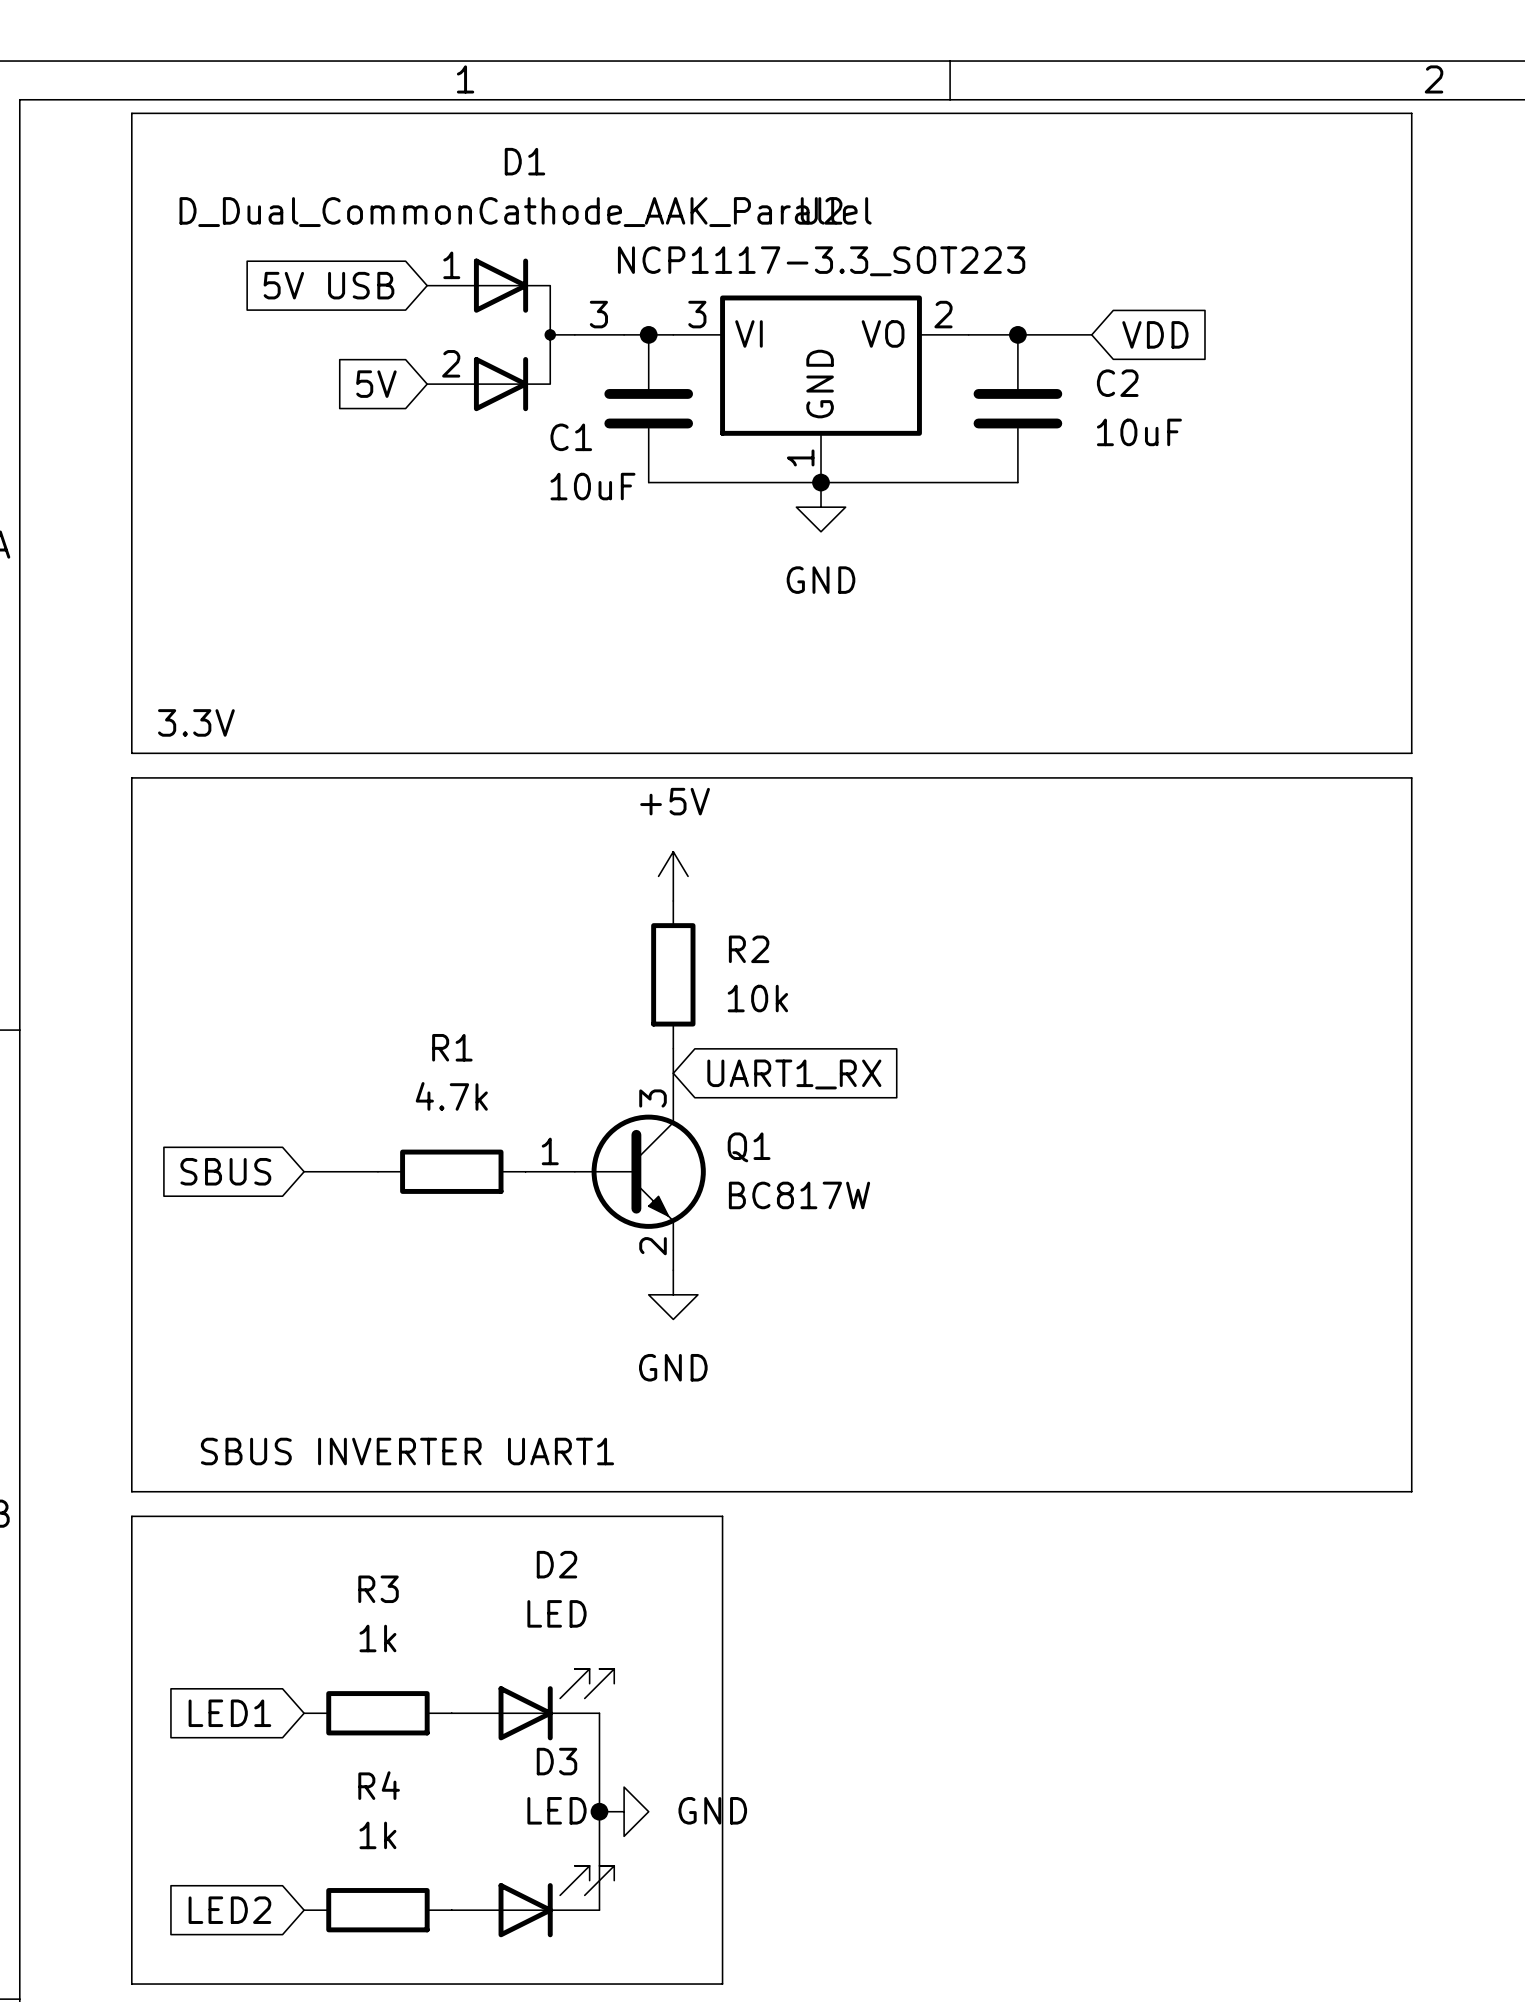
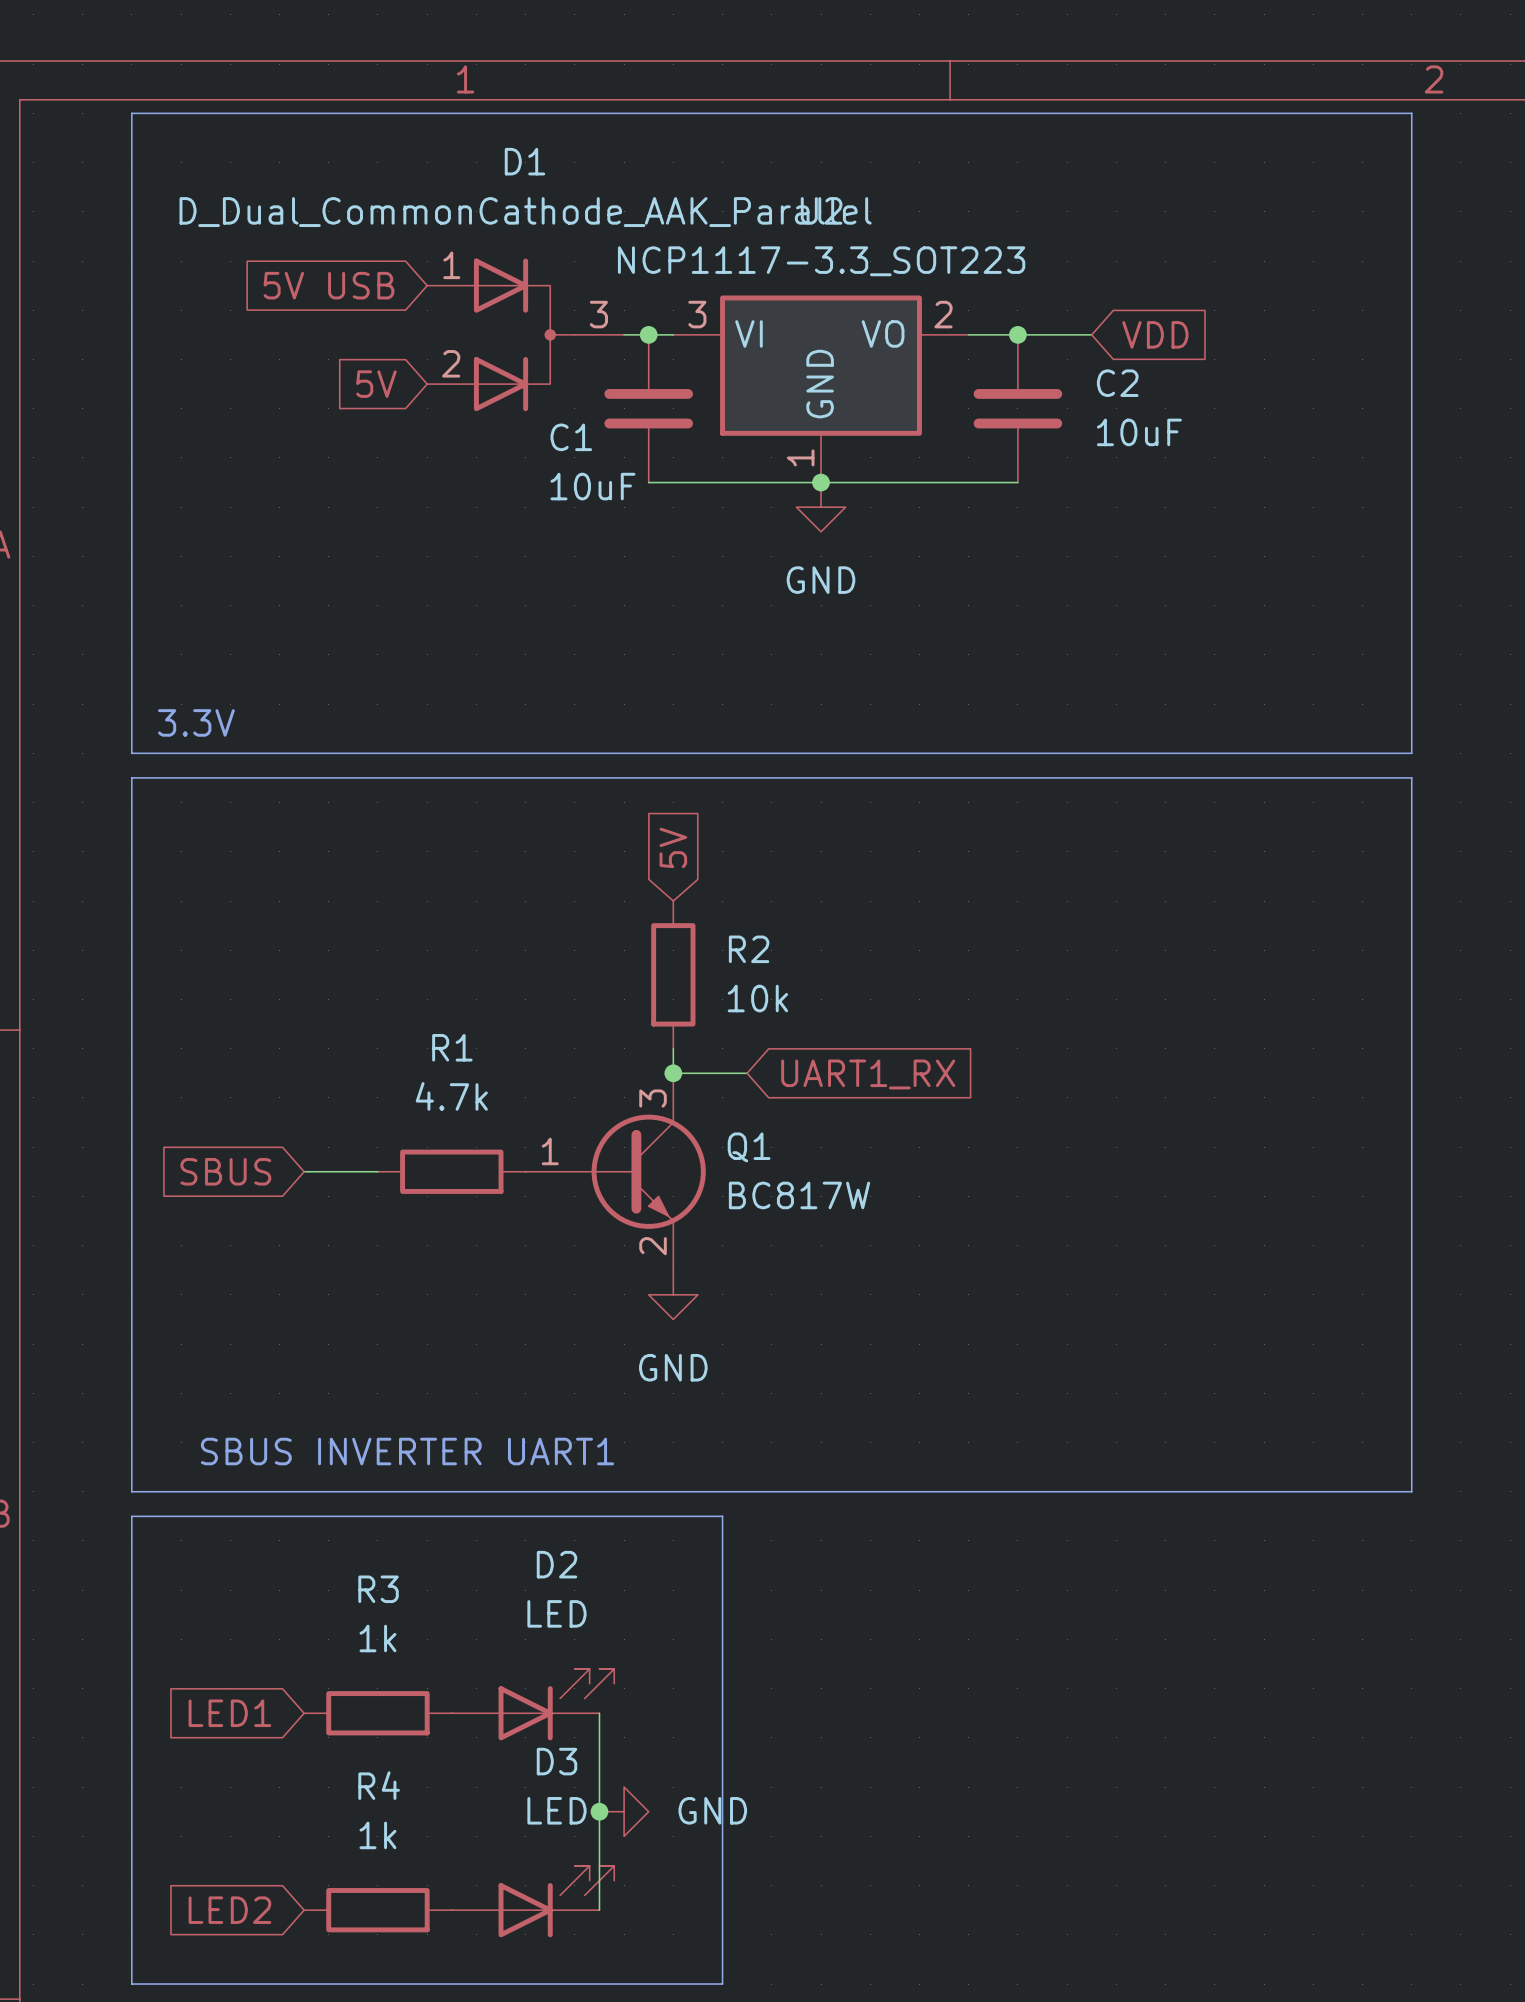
global label: none -> 5V (673, 847)
power symbol: +5V (673, 876) -> none
wire: none -> (673, 1073) (747, 1073)
junction: none -> (673, 1073)
global label position: UART1_RX (794, 1074) -> UART1_RX (868, 1074)

